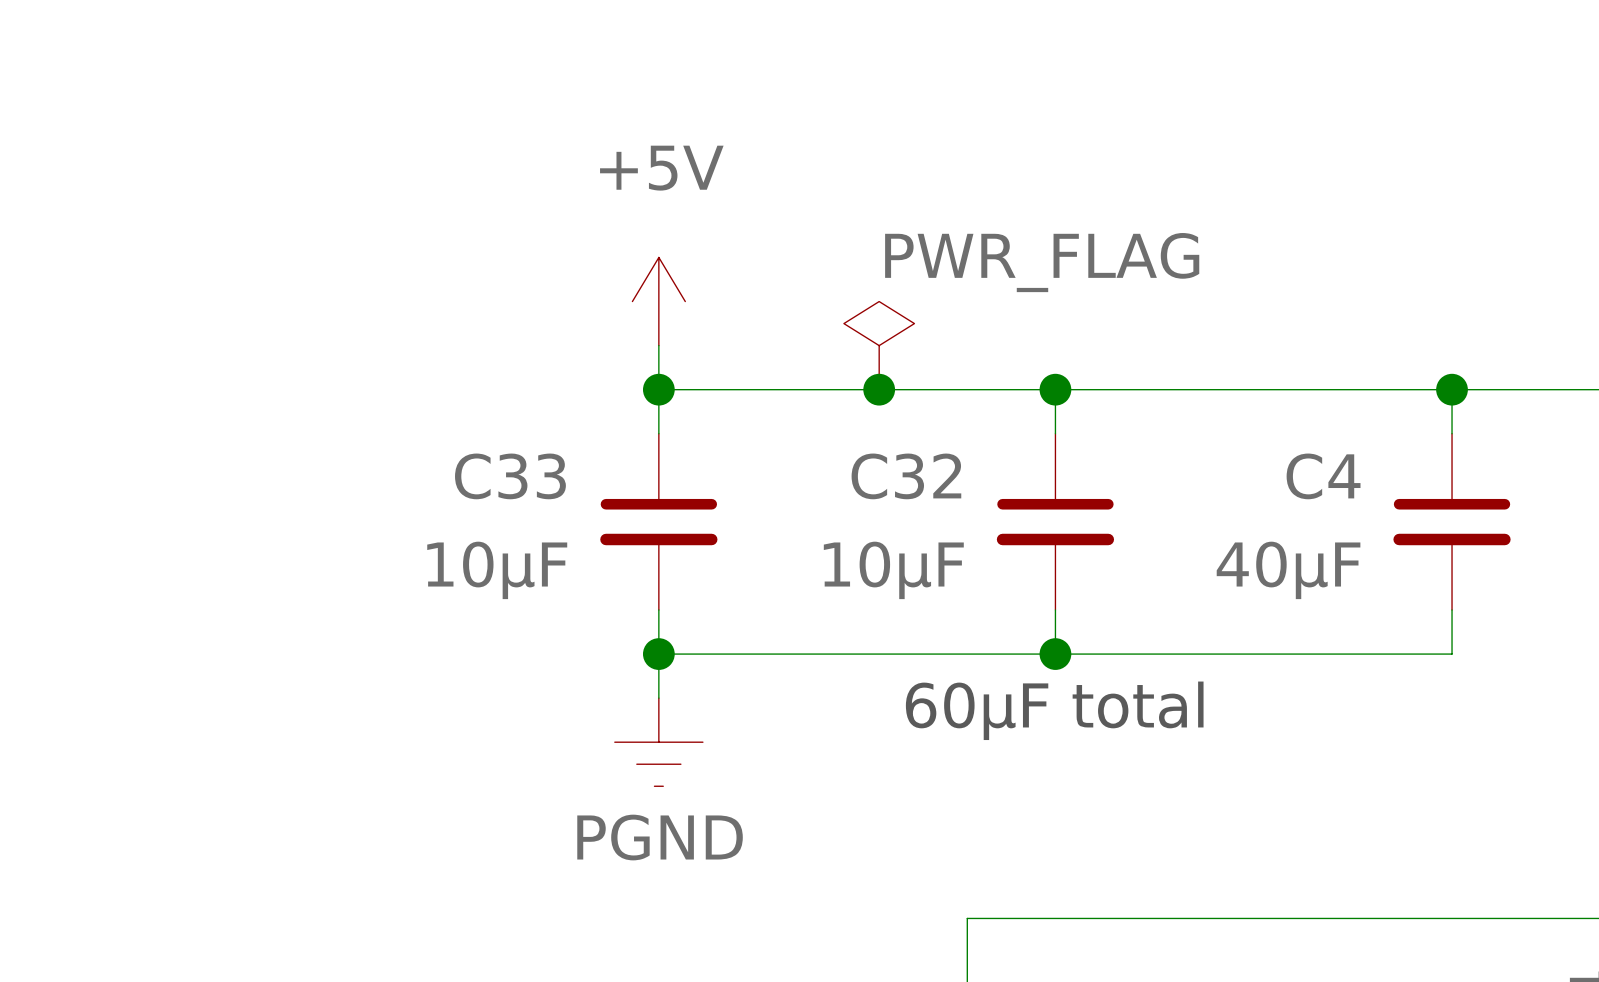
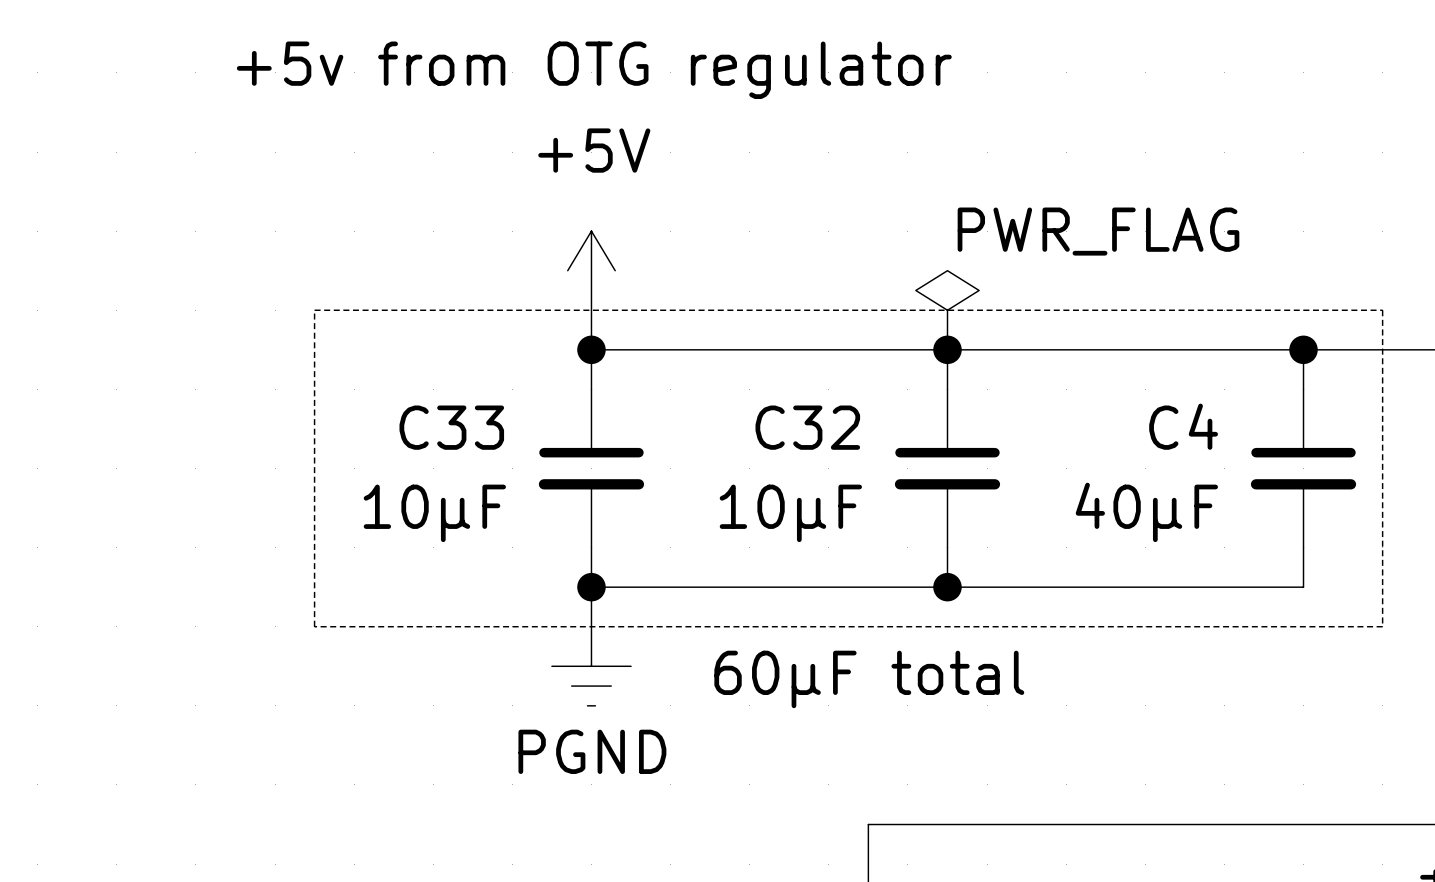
text: none -> +5v from OTG regulator (594, 70)
line: none -> (314, 310) (1382, 310) (1382, 626) (314, 626) (314, 310)
power symbol position: PWR_FLAG (879, 345) -> PWR_FLAG (947, 310)
junction: (879, 389) -> none
text position: 60μF total (1054, 710) -> 60μF total (869, 679)

